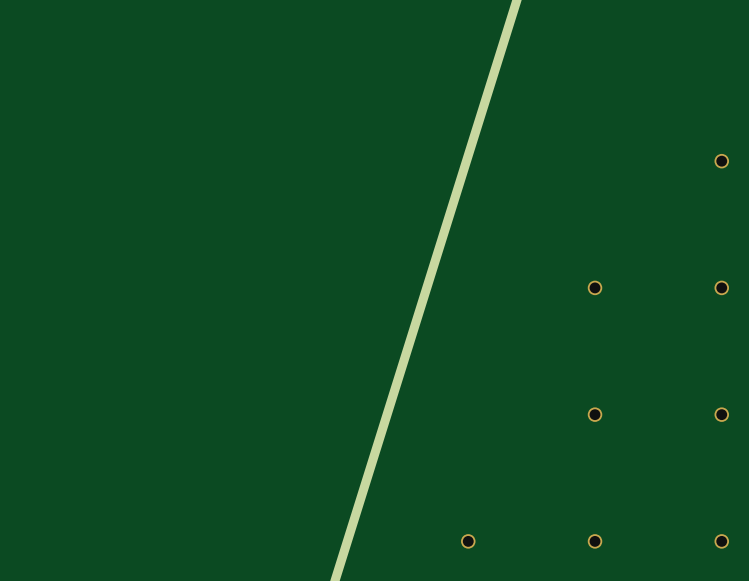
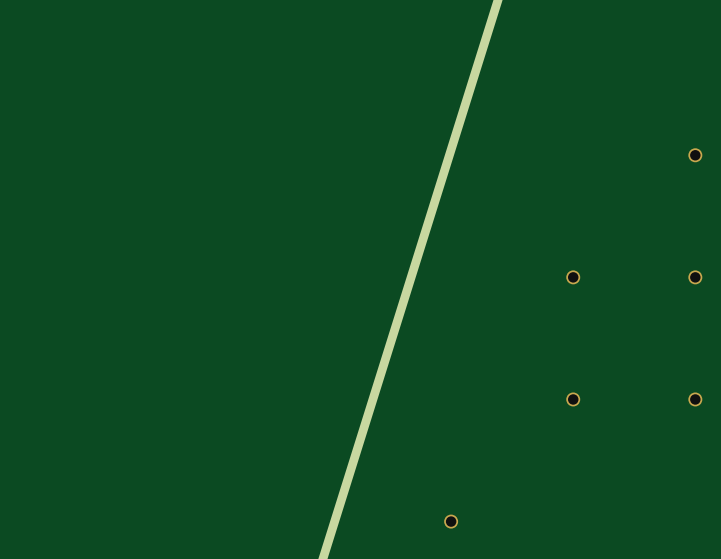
via: (595, 541) -> none
via: (721, 541) -> none

